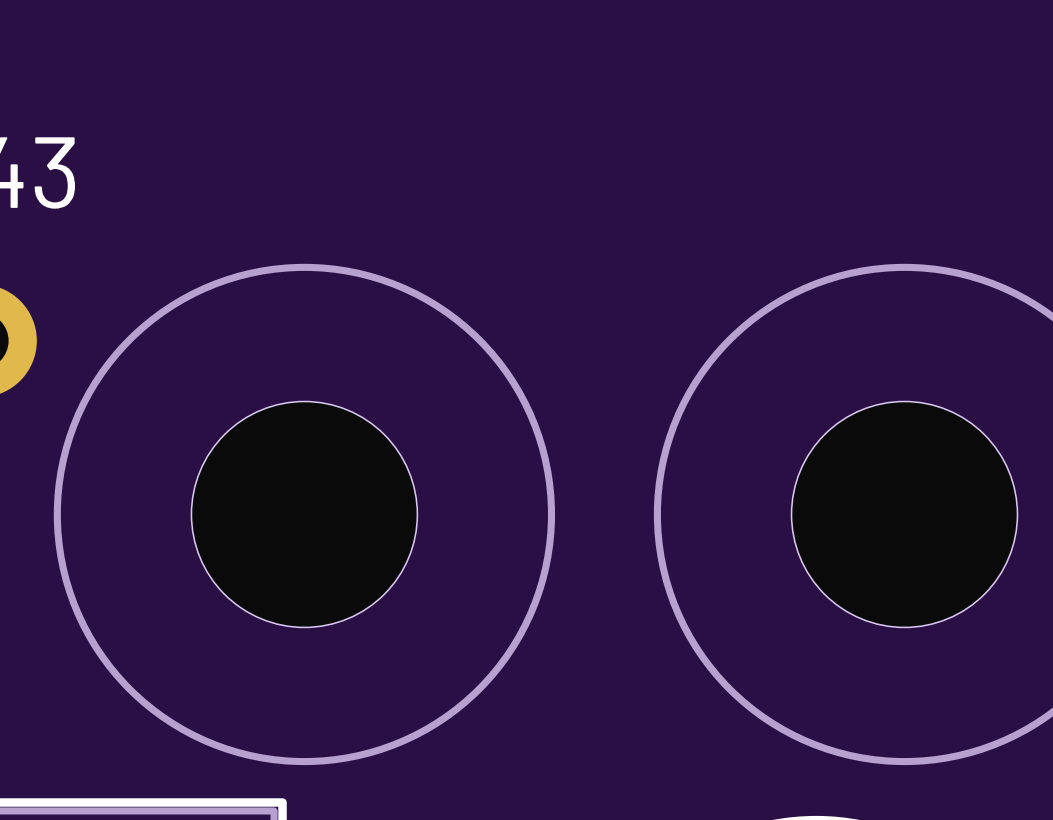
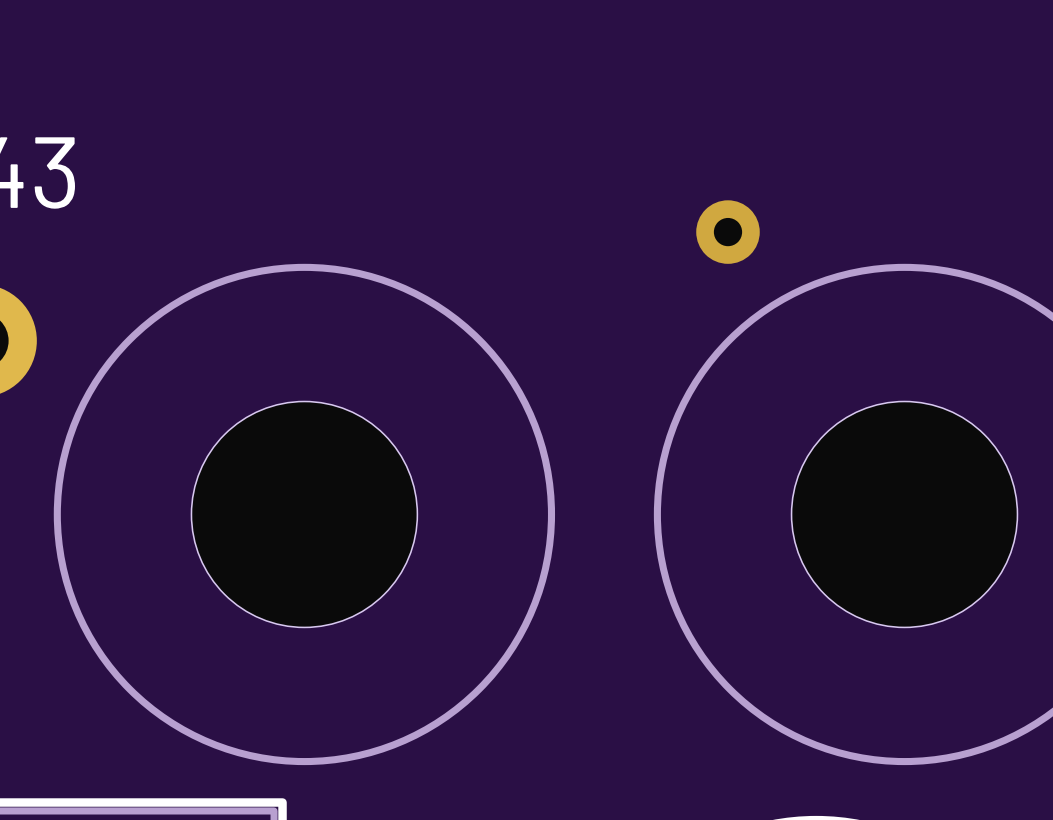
via: none -> (728, 232)

